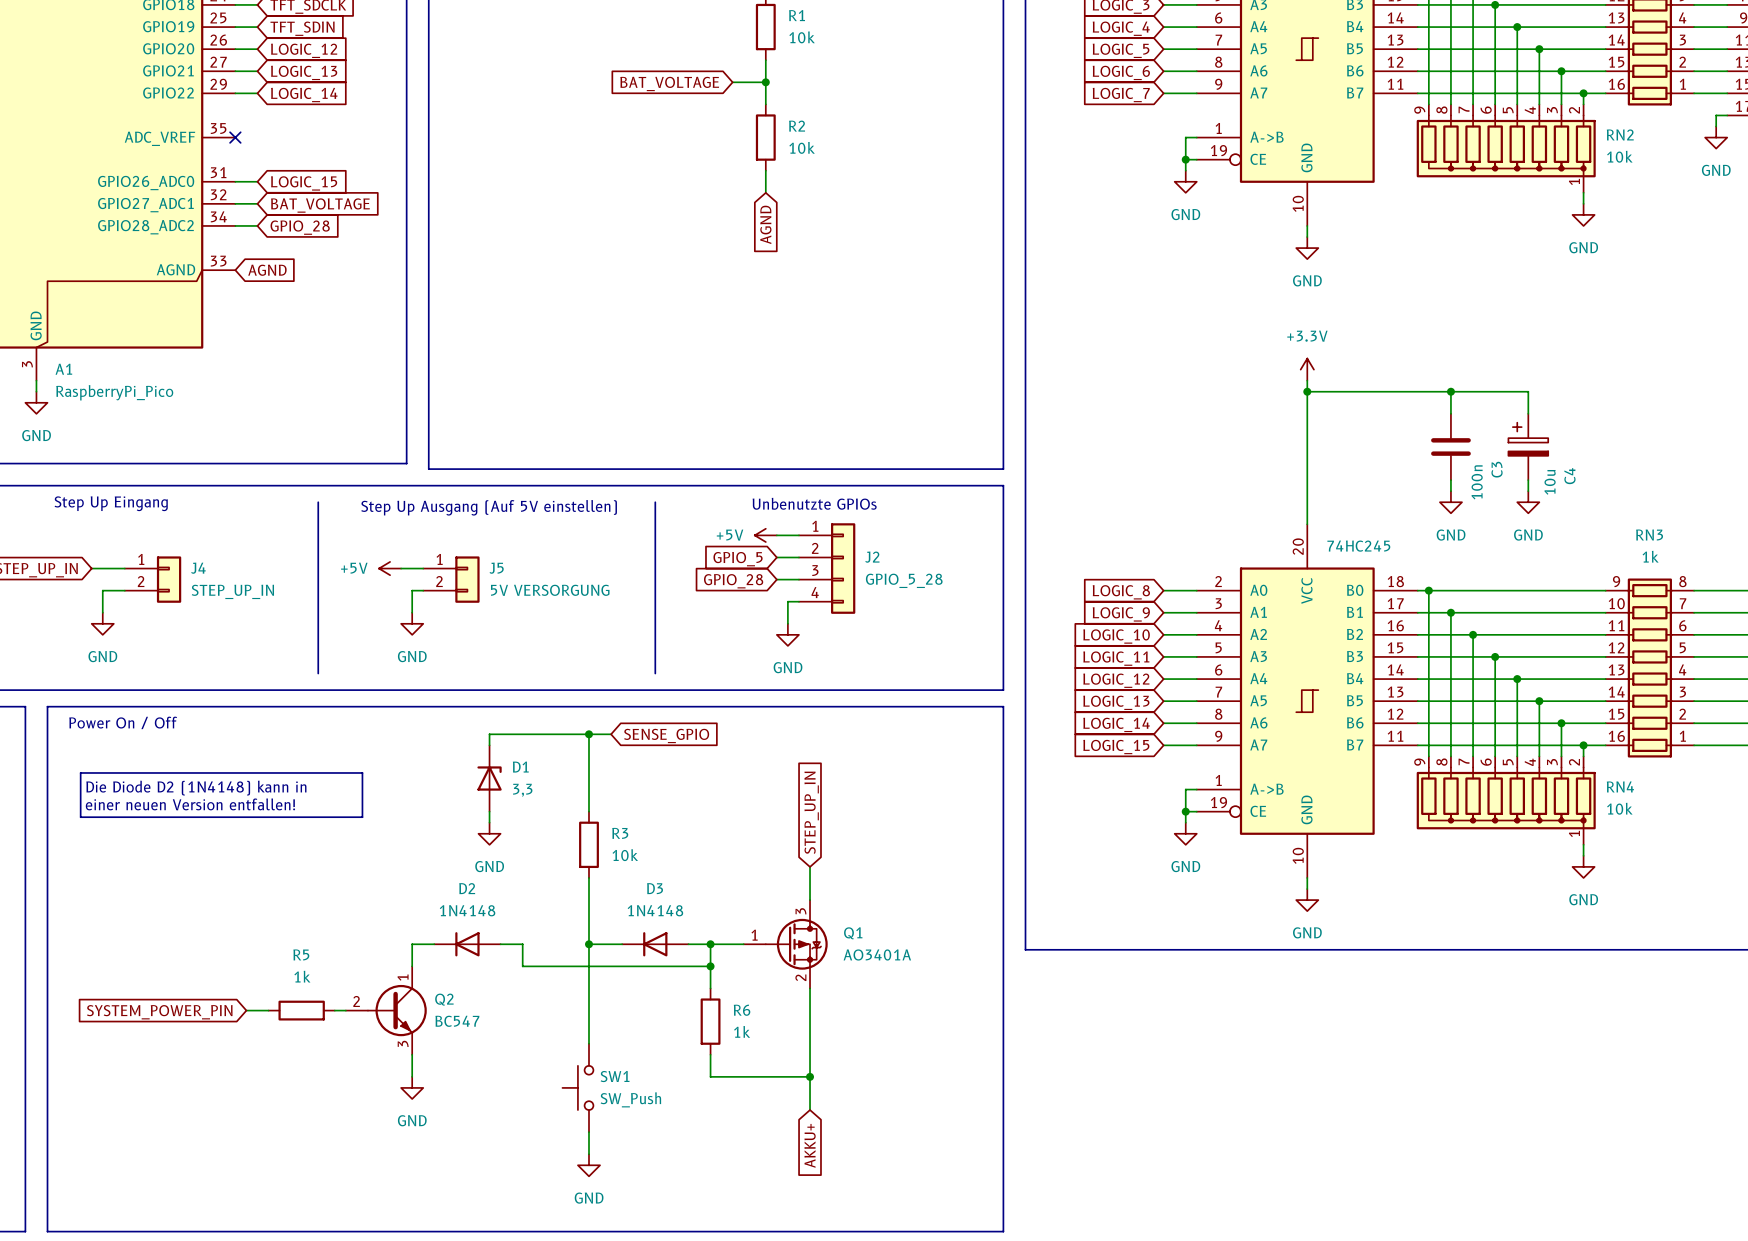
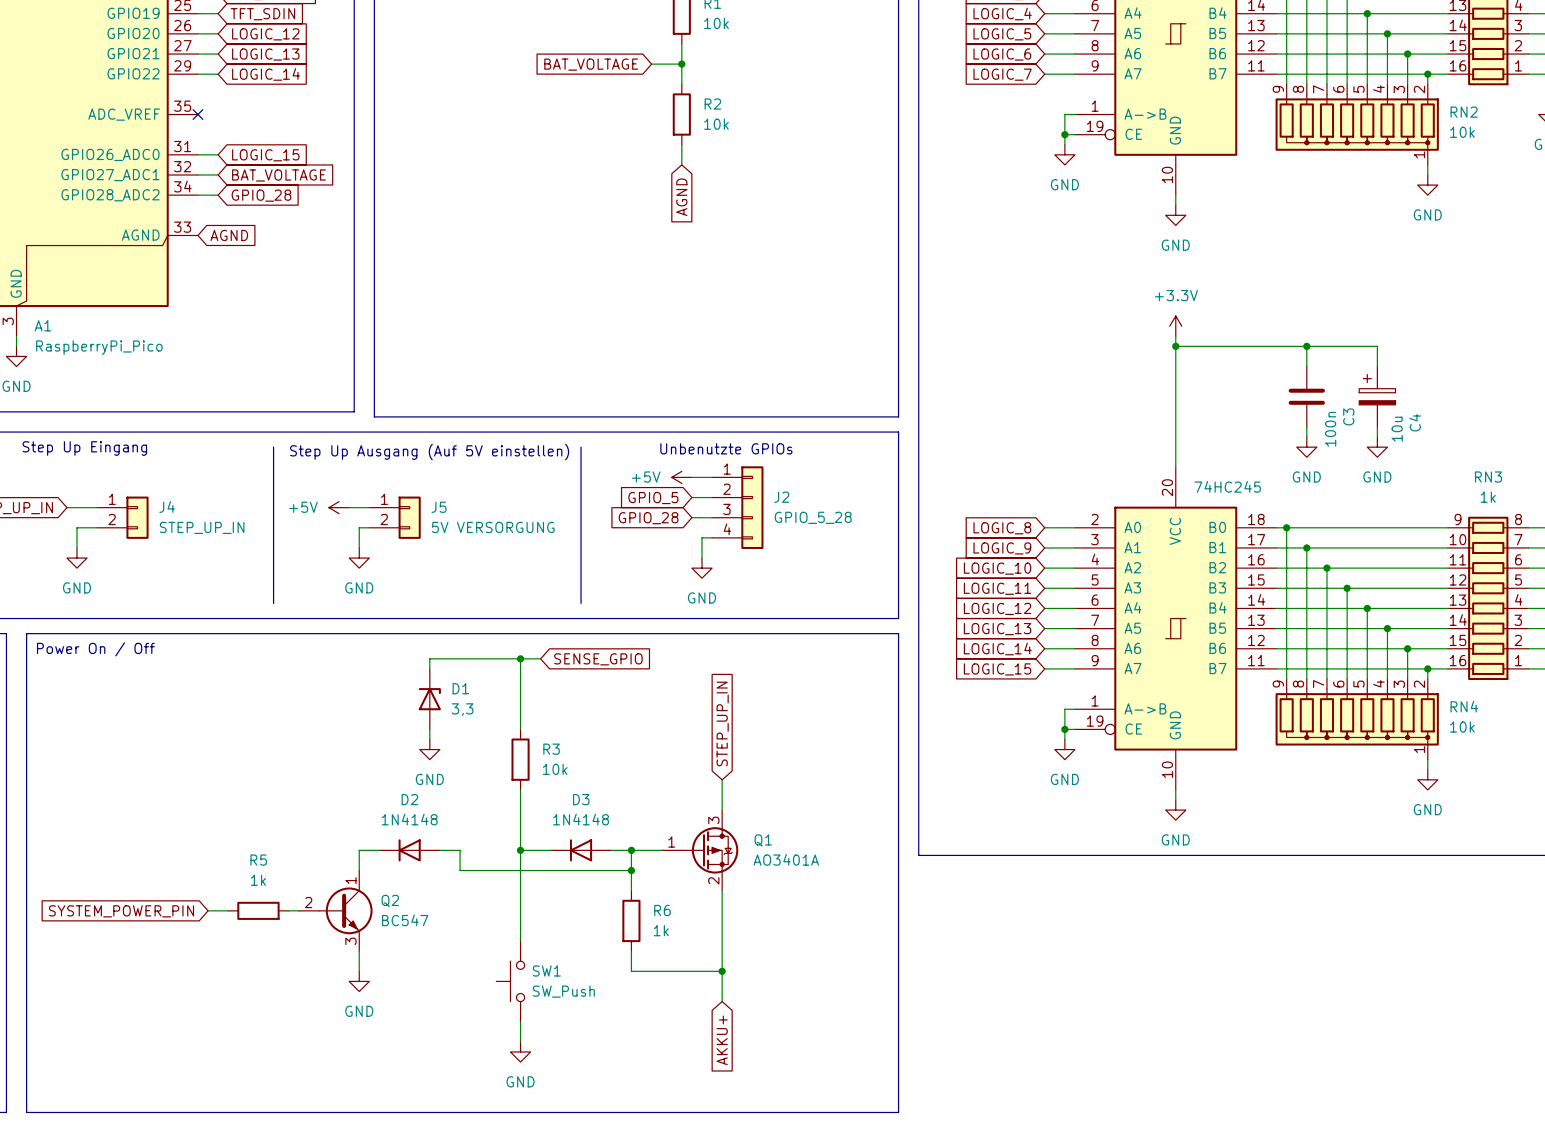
line: (80, 772) (362, 772) (362, 817) (80, 817) (80, 772) -> none
text: Die Diode D2 (1N4148) kann in (196, 788) -> none
text: einer neuen Version entfallen! (190, 804) -> none

